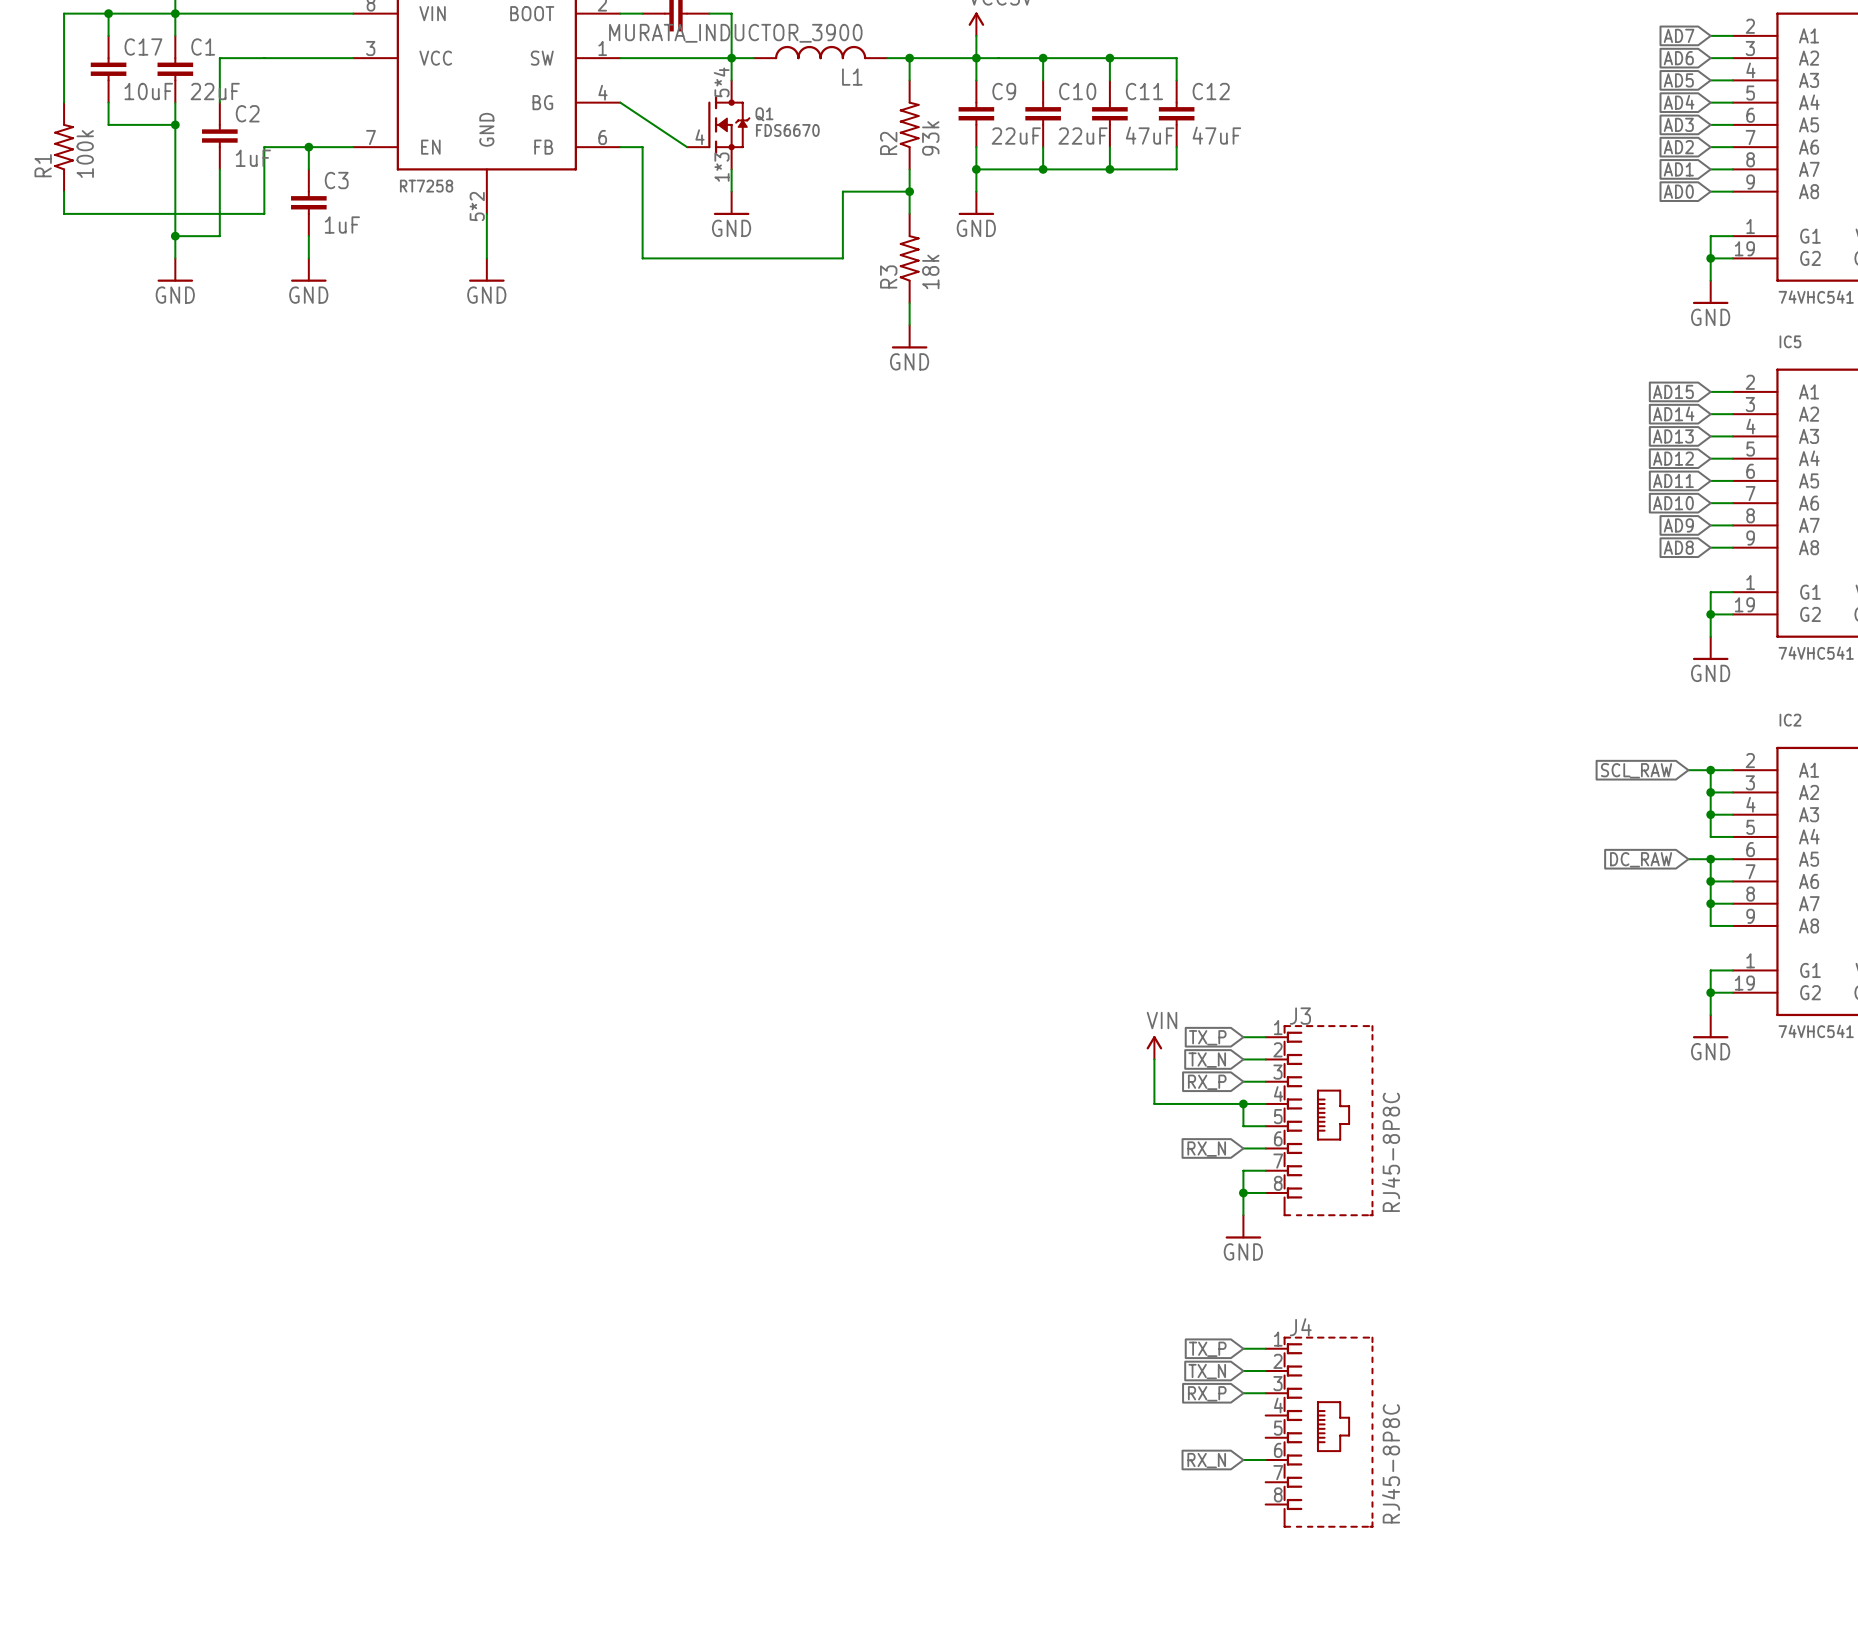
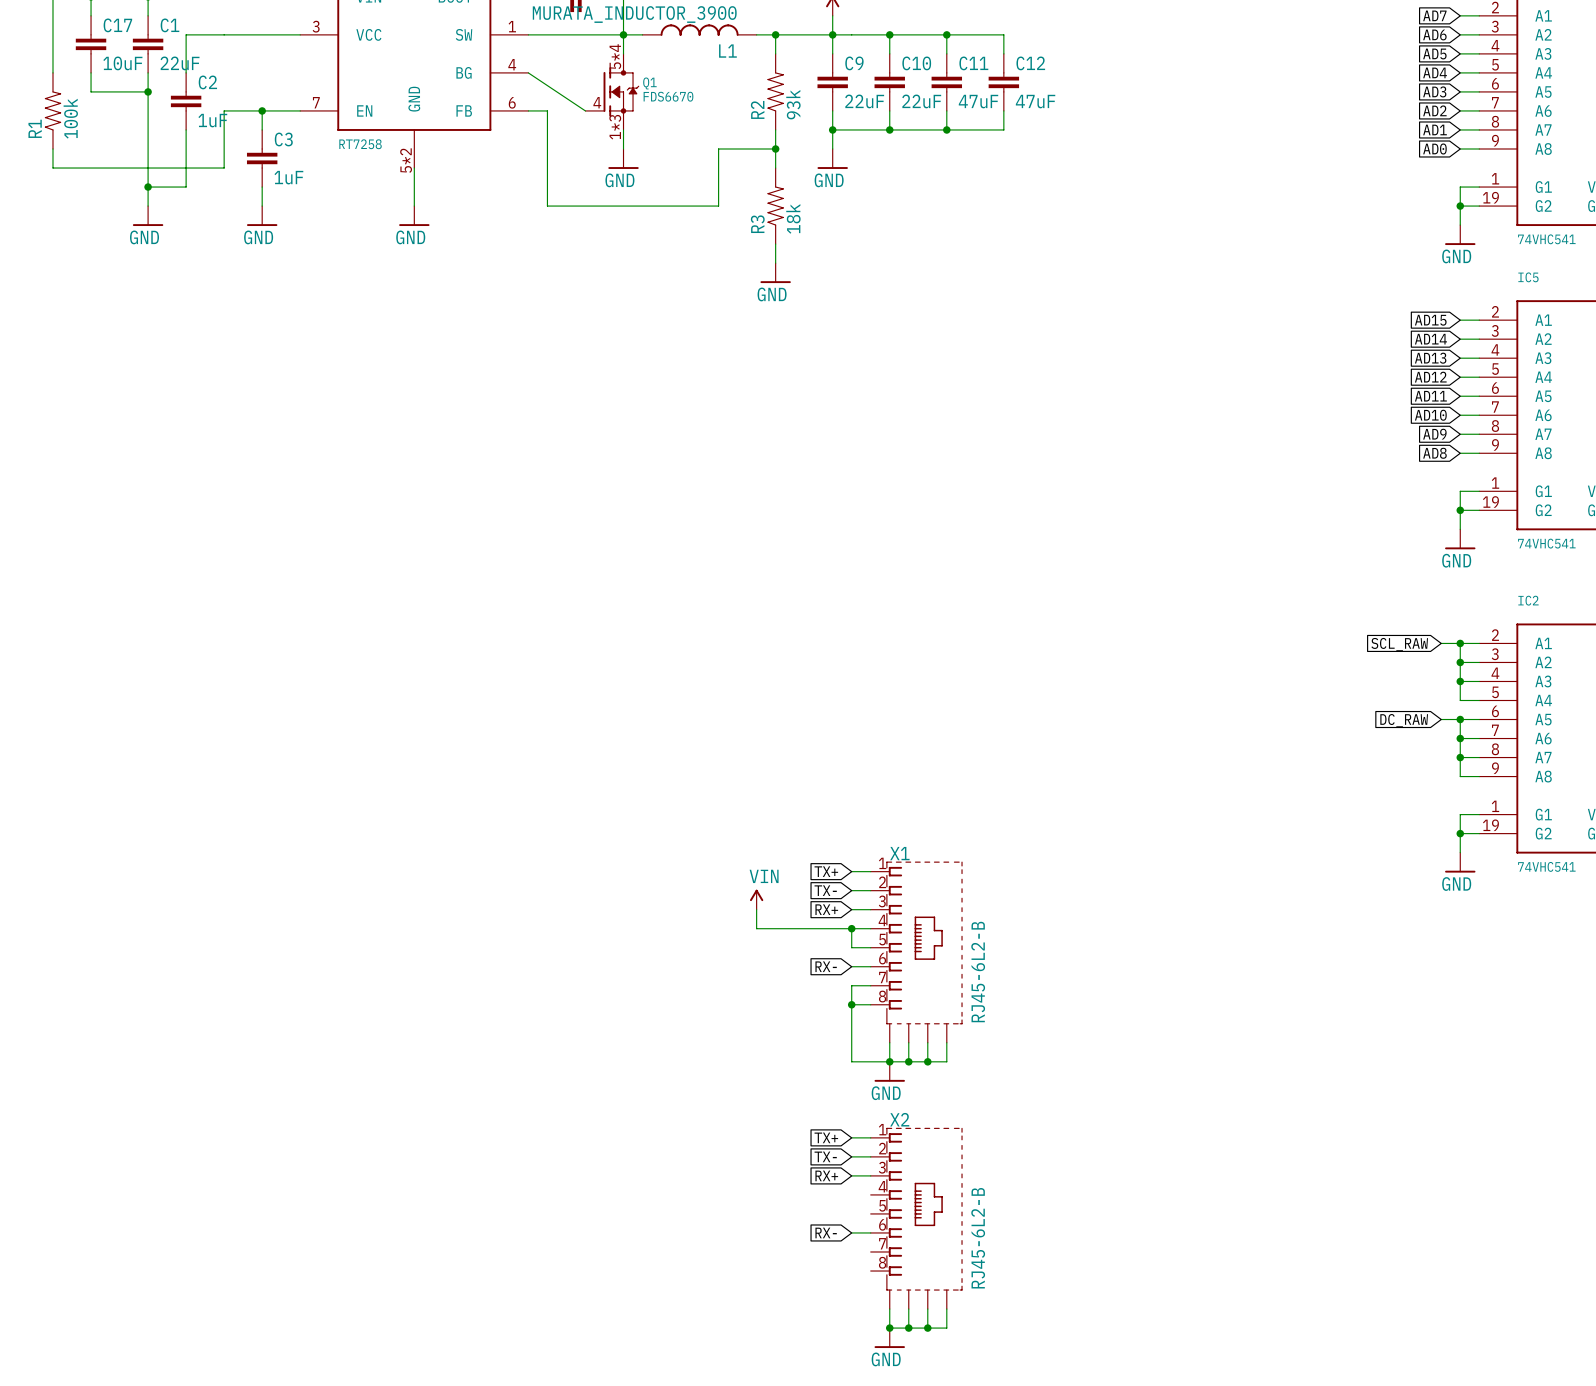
global label: none -> TX+ (826, 871)
wire: none -> (851, 871) (870, 871)
global label: TX_P (1207, 1037) -> none
wire: (1243, 1037) (1265, 1037) -> none
power symbol: VIN (1154, 1047) -> none
global label: none -> TX- (825, 890)
wire: none -> (851, 890) (870, 890)
wire: (1154, 1059) (1154, 1103) (1265, 1103) -> none
wire: (1243, 1059) (1265, 1059) -> none
global label: TX_N (1207, 1060) -> none
power symbol: none -> VIN (756, 899)
wire: none -> (756, 909) (756, 928) (870, 928)
global label: none -> RX+ (826, 909)
wire: none -> (851, 909) (870, 909)
wire: (1243, 1081) (1265, 1081) -> none
global label: RX_P (1207, 1082) -> none
wire: none -> (851, 928) (851, 947) (870, 947)
junction: none -> (851, 928)
wire: (1243, 1103) (1243, 1126) (1265, 1126) -> none
junction: (1243, 1103) -> none
J3: RJ45-8P8C (1319, 1120) -> none
X1: none -> RJ45-6L2-B (916, 952)
global label: none -> RX- (826, 966)
wire: none -> (851, 966) (870, 966)
wire: (1243, 1148) (1265, 1148) -> none
global label: RX_N (1206, 1149) -> none
wire: none -> (870, 985) (851, 985) (851, 1061) (946, 1061) (946, 1042)
wire: (1265, 1170) (1243, 1170) (1243, 1215) -> none
wire: none -> (851, 1004) (870, 1004)
junction: none -> (851, 1004)
wire: (1243, 1192) (1265, 1192) -> none
junction: (1243, 1192) -> none
power symbol: GND (1243, 1226) -> none
wire: none -> (889, 1042) (889, 1061)
wire: none -> (908, 1042) (908, 1061)
wire: none -> (927, 1042) (927, 1061)
junction: none -> (889, 1061)
junction: none -> (908, 1061)
junction: none -> (927, 1061)
power symbol: none -> GND (889, 1071)
global label: none -> TX+ (826, 1137)
wire: none -> (851, 1137) (870, 1137)
wire: (1243, 1348) (1265, 1348) -> none
global label: TX_P (1207, 1349) -> none
global label: none -> TX- (825, 1156)
wire: none -> (851, 1156) (870, 1156)
wire: (1243, 1370) (1265, 1370) -> none
global label: TX_N (1207, 1371) -> none
global label: none -> RX+ (826, 1175)
wire: none -> (851, 1175) (870, 1175)
global label: RX_P (1207, 1393) -> none
wire: (1243, 1393) (1265, 1393) -> none
J4: RJ45-8P8C (1319, 1432) -> none
X2: none -> RJ45-6L2-B (916, 1218)
global label: none -> RX- (826, 1232)
wire: none -> (851, 1232) (870, 1232)
global label: RX_N (1206, 1460) -> none
wire: (1243, 1460) (1265, 1460) -> none
wire: none -> (889, 1309) (889, 1328) (946, 1328) (946, 1309)
wire: none -> (908, 1309) (908, 1328)
wire: none -> (927, 1309) (927, 1328)
junction: none -> (889, 1328)
junction: none -> (908, 1328)
junction: none -> (927, 1328)
power symbol: none -> GND (889, 1338)

